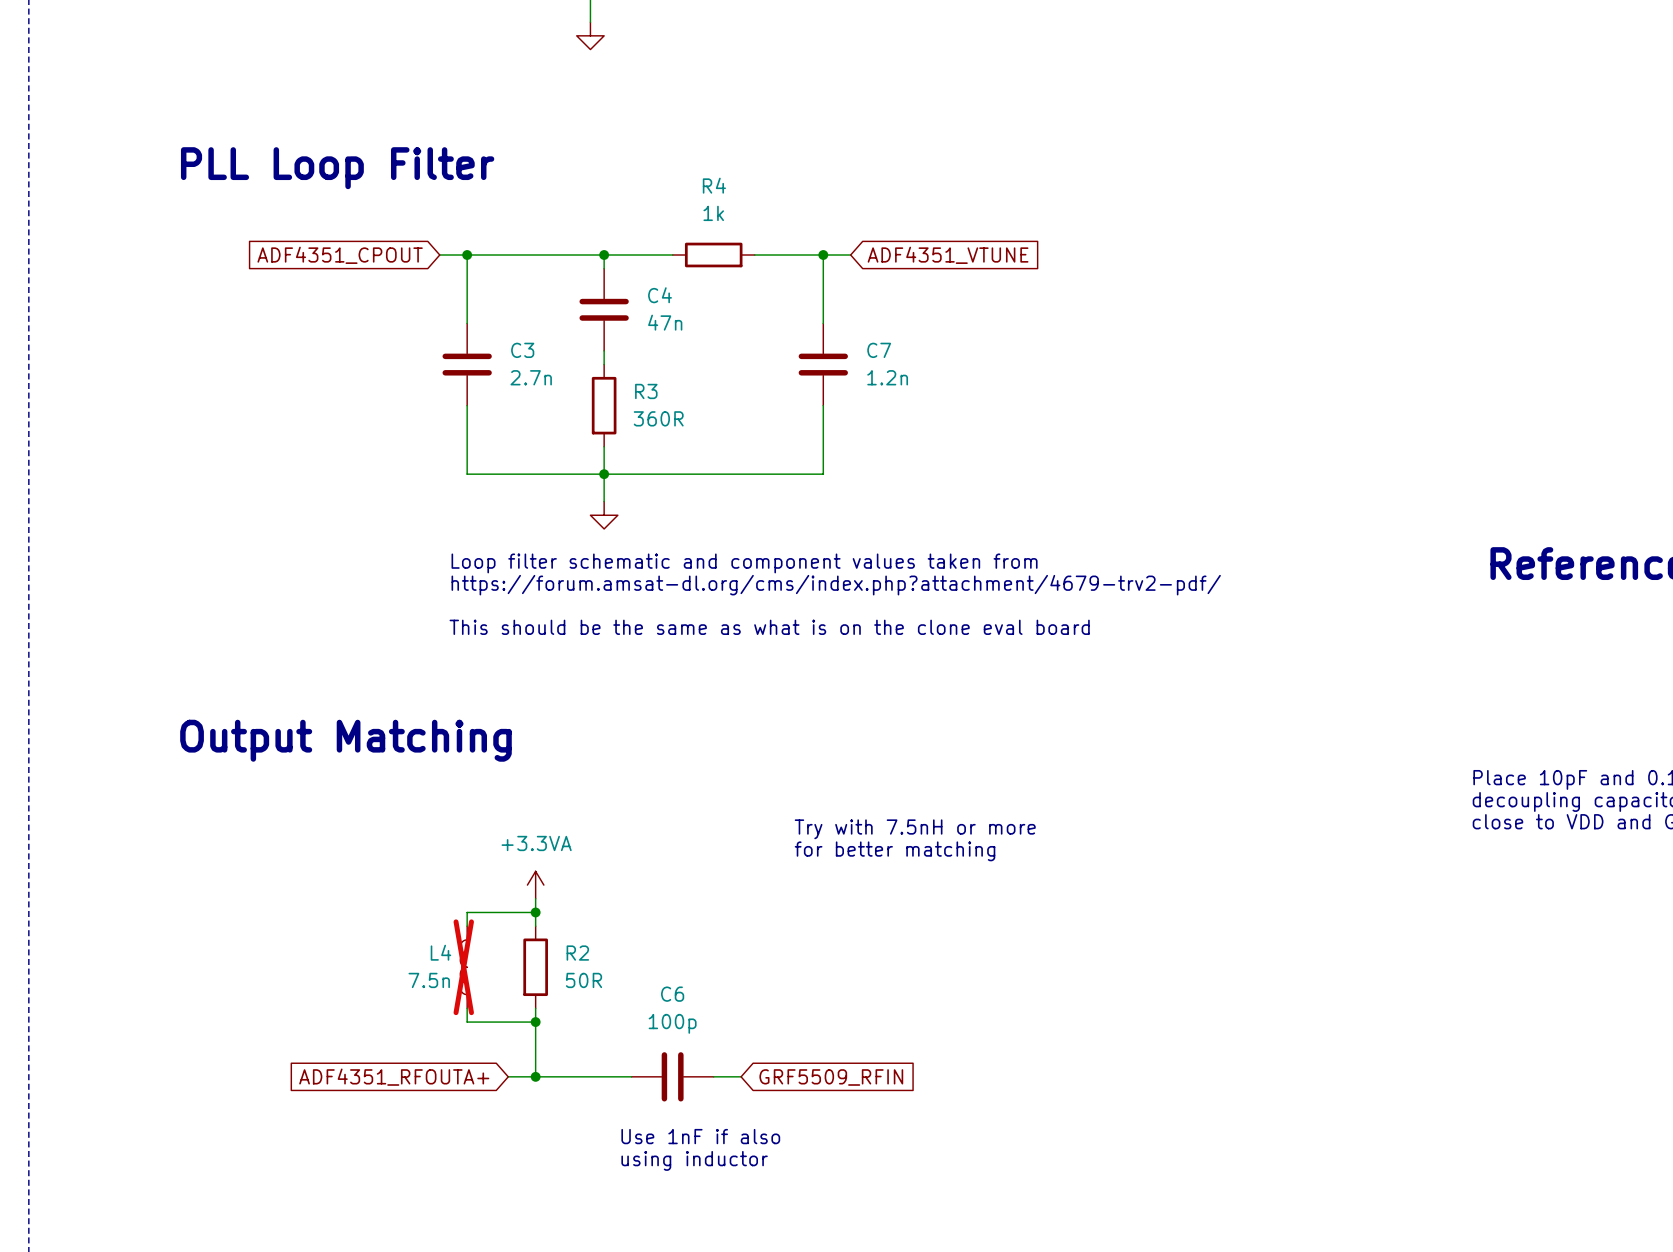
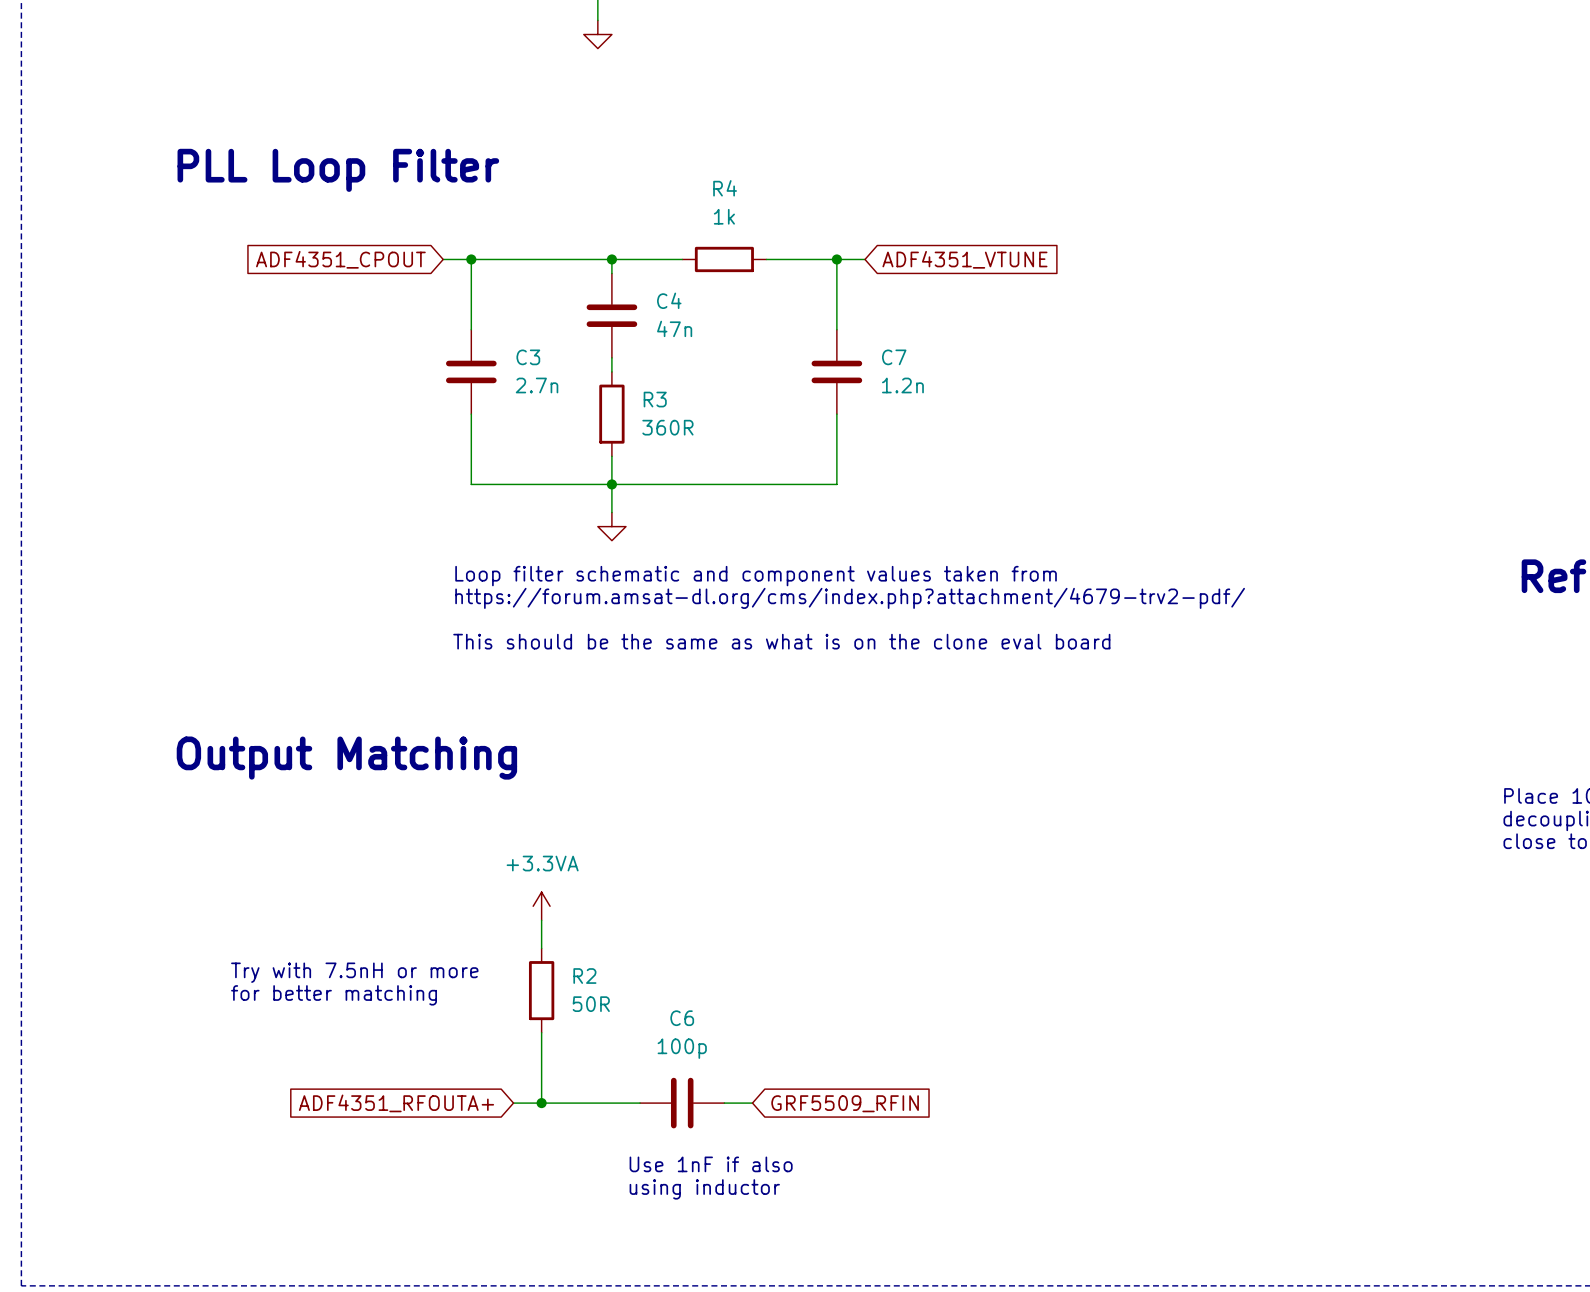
text: Try with 7.5nH or more (915, 829) -> none
text: for better matching (895, 851) -> none
wire: (535, 912) (467, 912) (467, 926) -> none
junction: (535, 912) -> none
text: none -> Try with 7.5nH or more (354, 972)
L4: 7.5n (463, 967) -> none
text: none -> for better matching (334, 995)
wire: (467, 1008) (467, 1022) (535, 1022) -> none
junction: (535, 1022) -> none

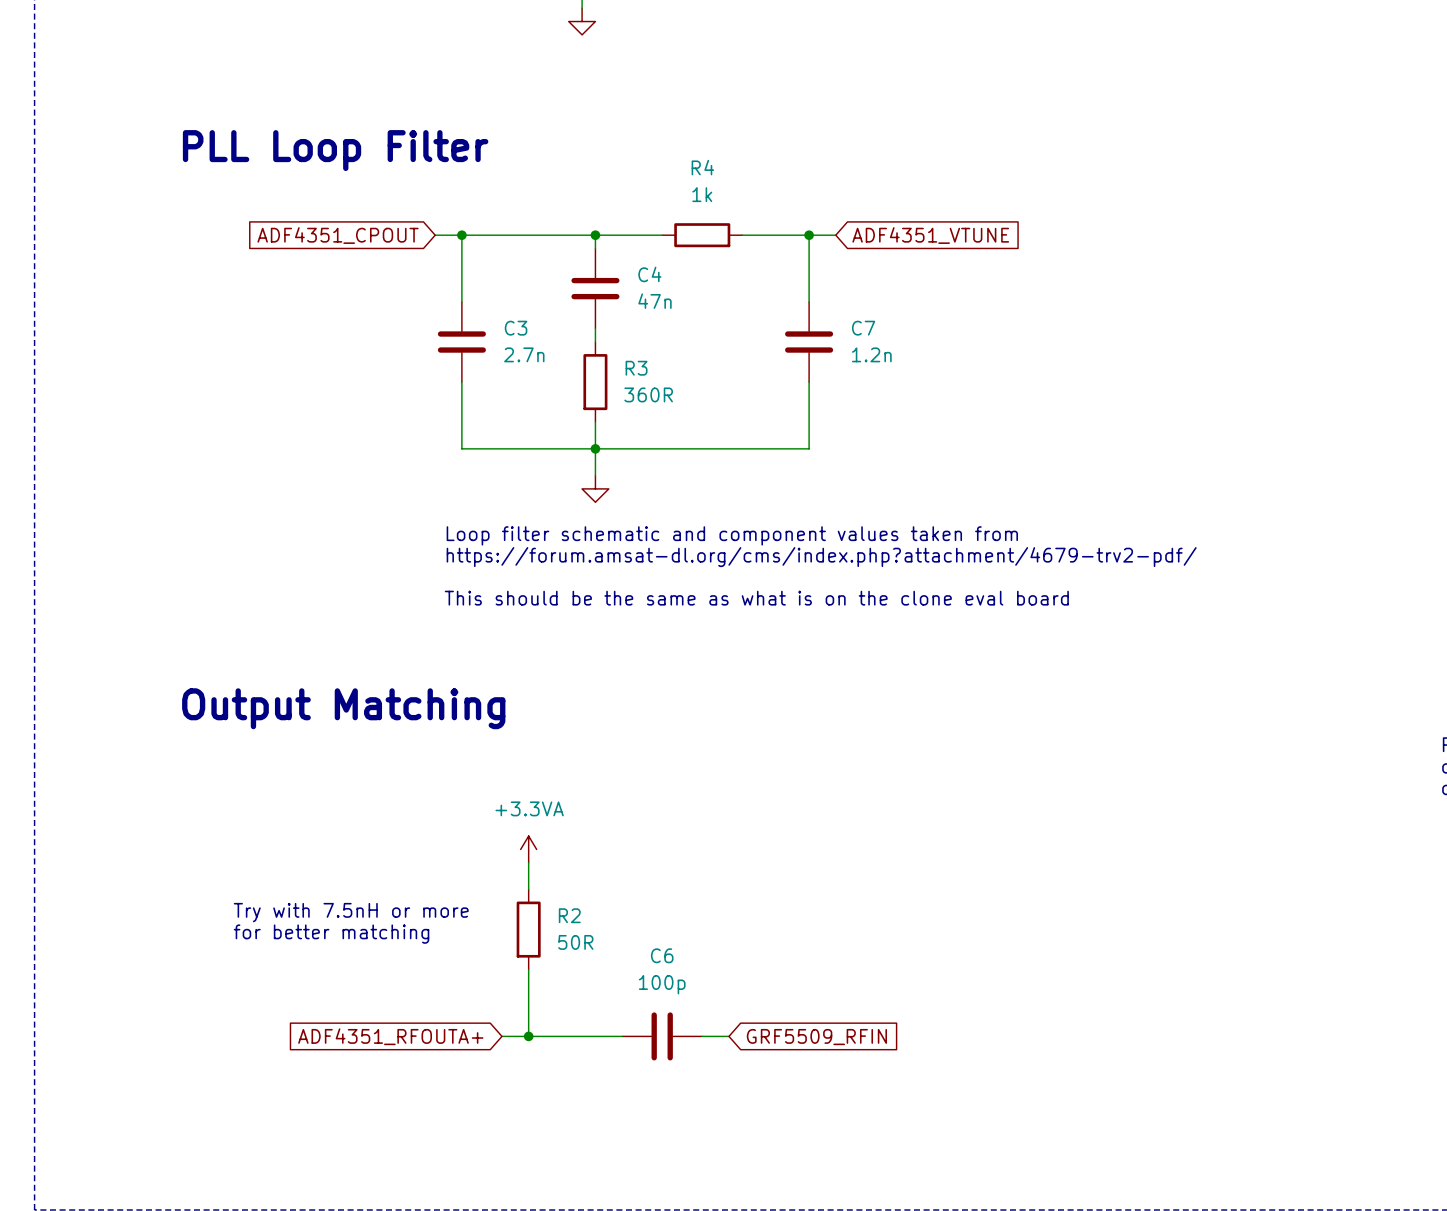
text: Use 1nF if also (711, 1164) -> none
text: using inductor (704, 1189) -> none

